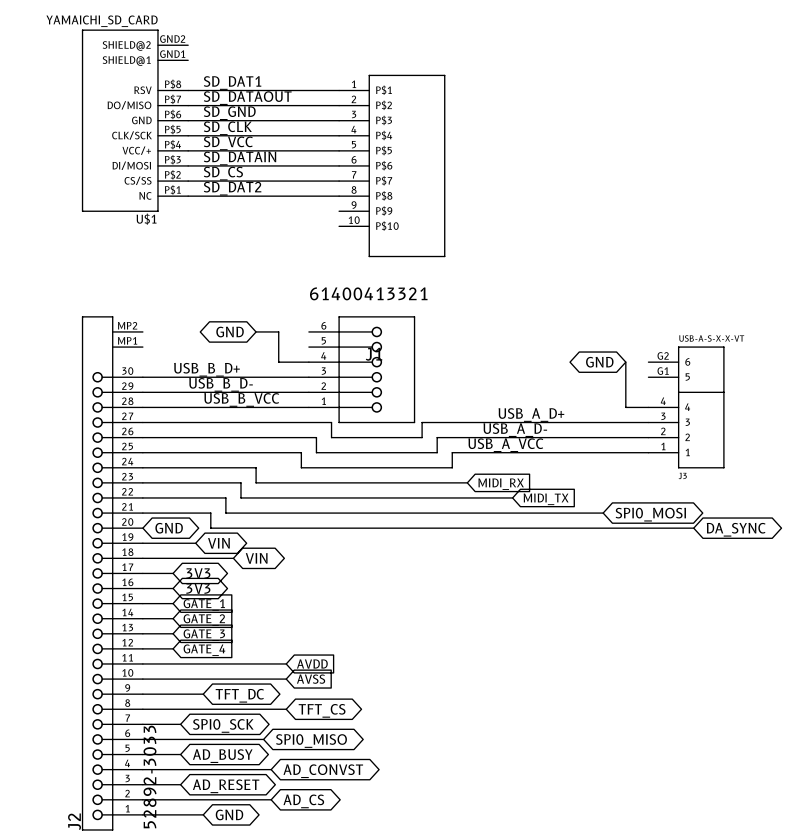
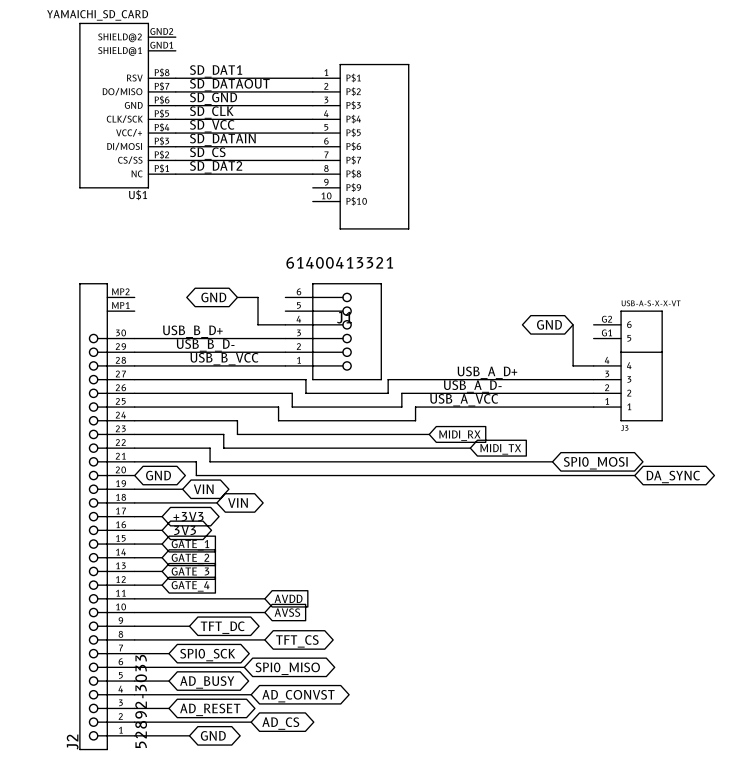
global label: 3V3 (198, 573) -> +3V3 (188, 516)

